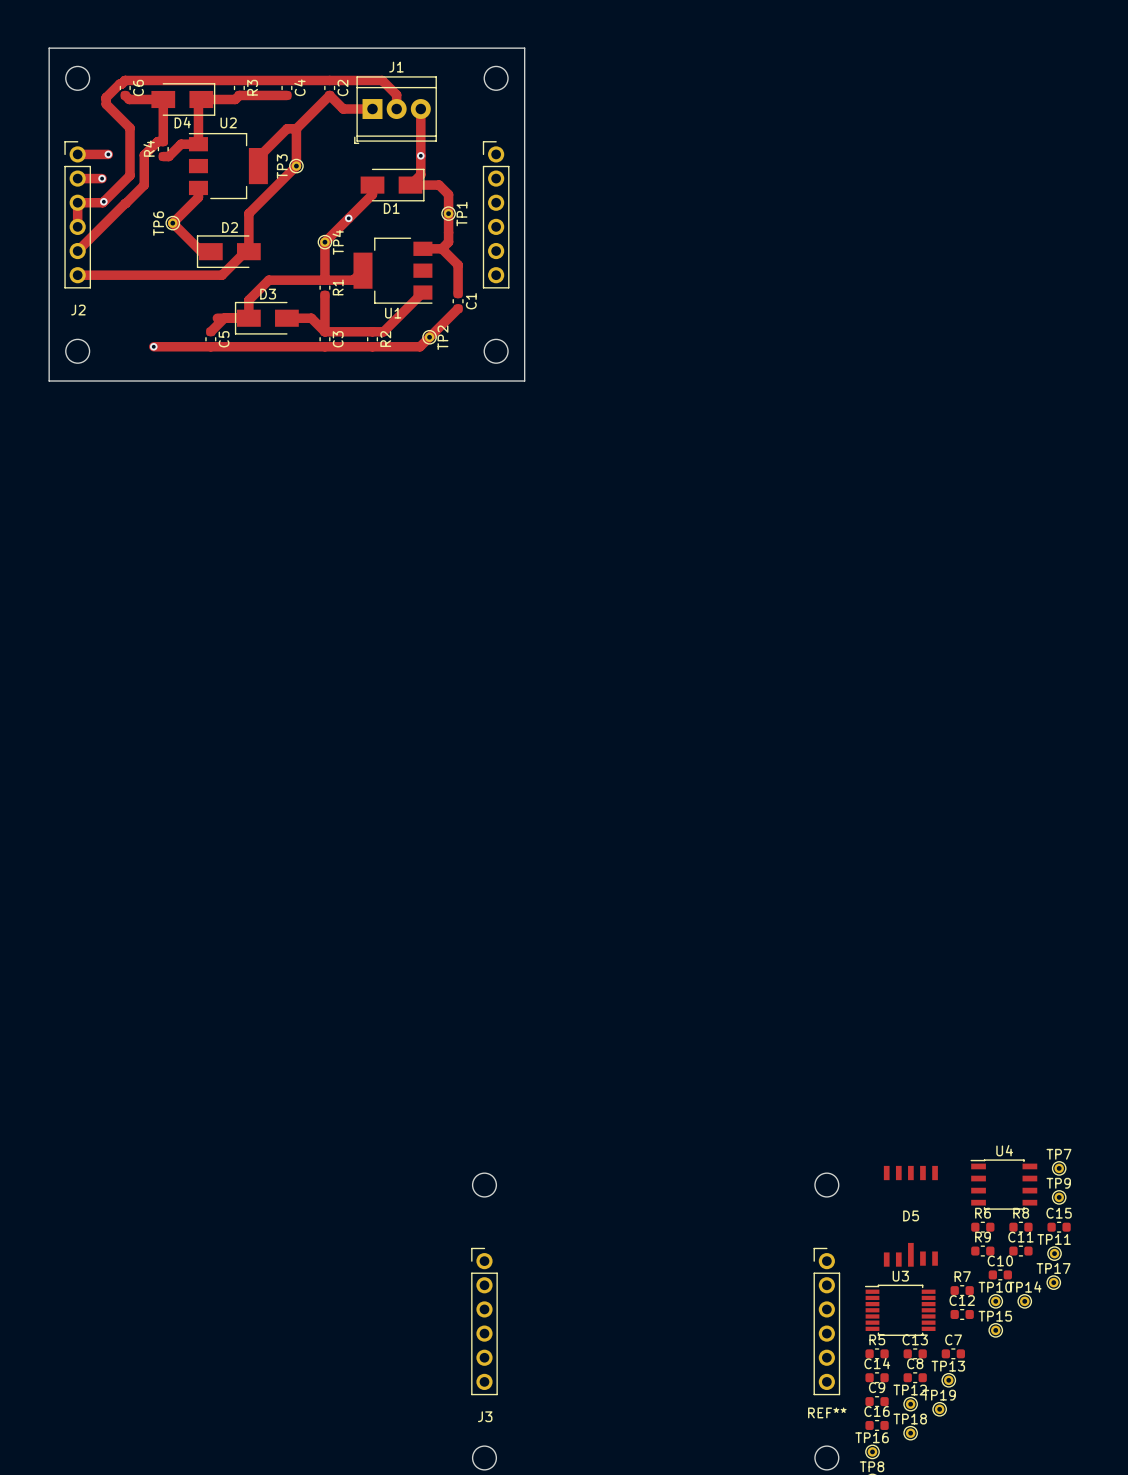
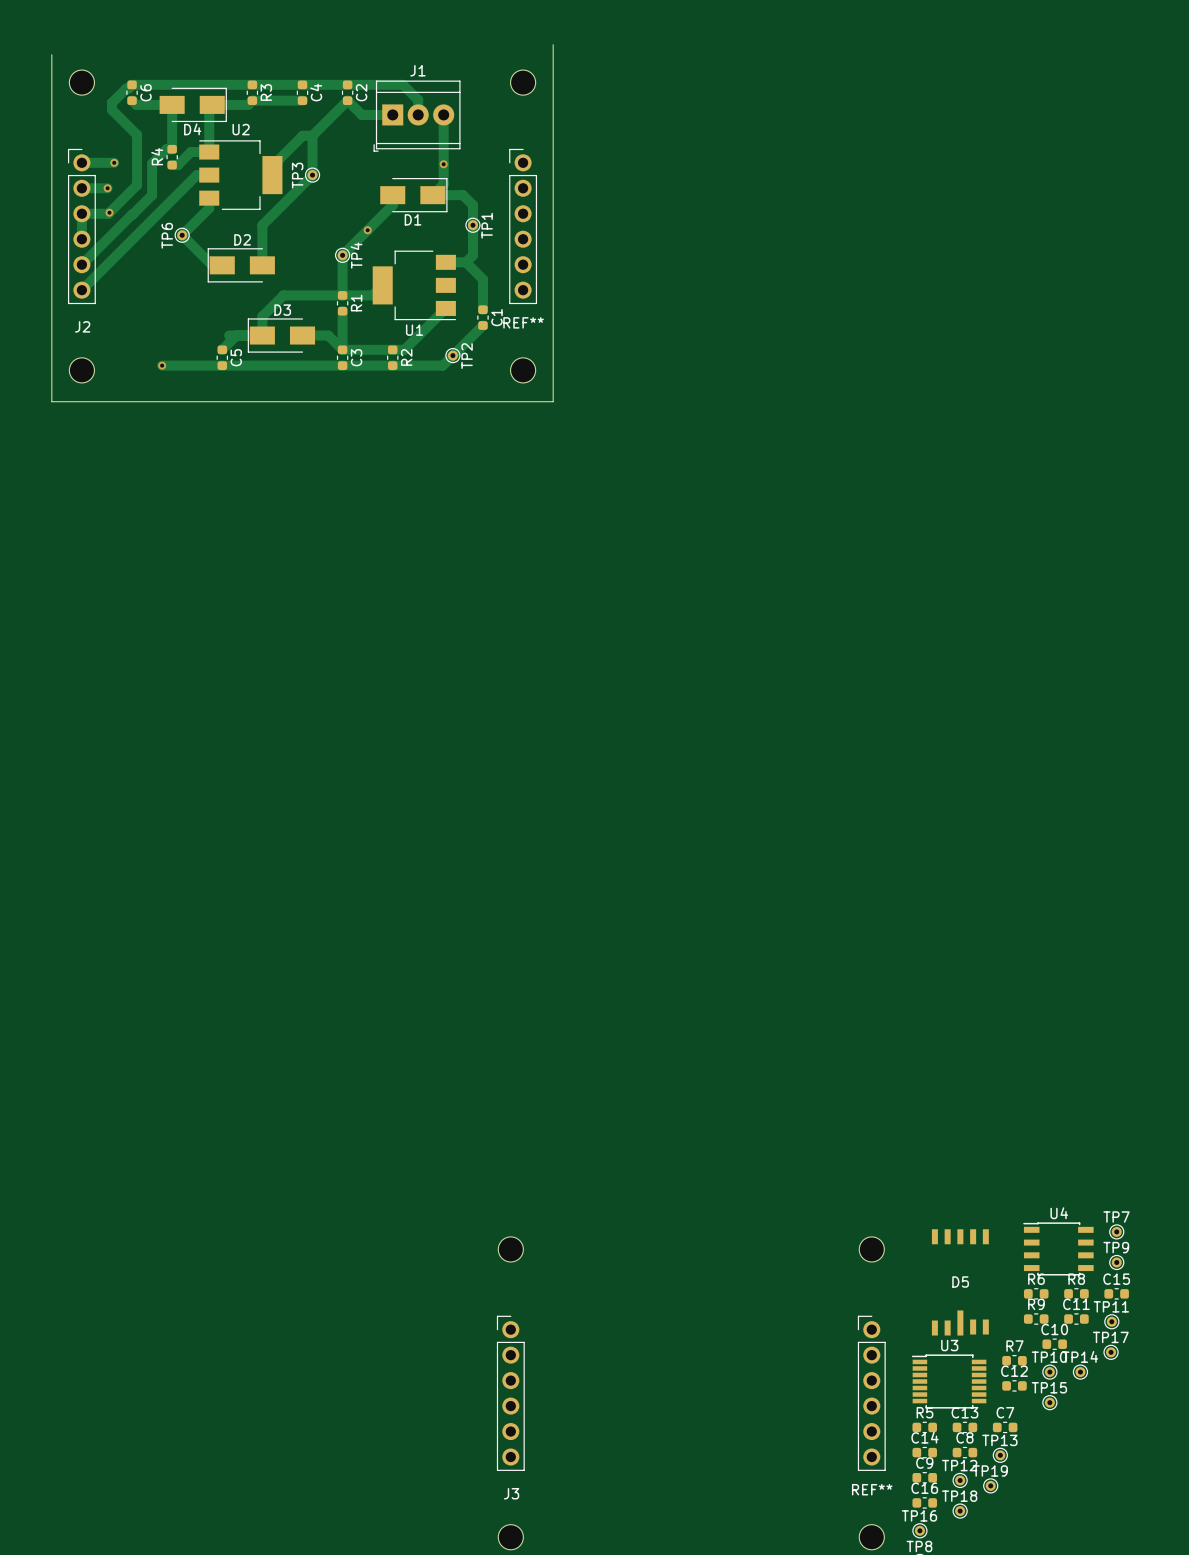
board edge: (524, 48) (49, 48) (49, 51) -> (553, 50) (553, 44)
track: (248, 251) (245, 251) (222, 275) (77, 275) -> (209, 175) (196, 175) (81, 290)
J2 text: none -> REF** (523, 322)

